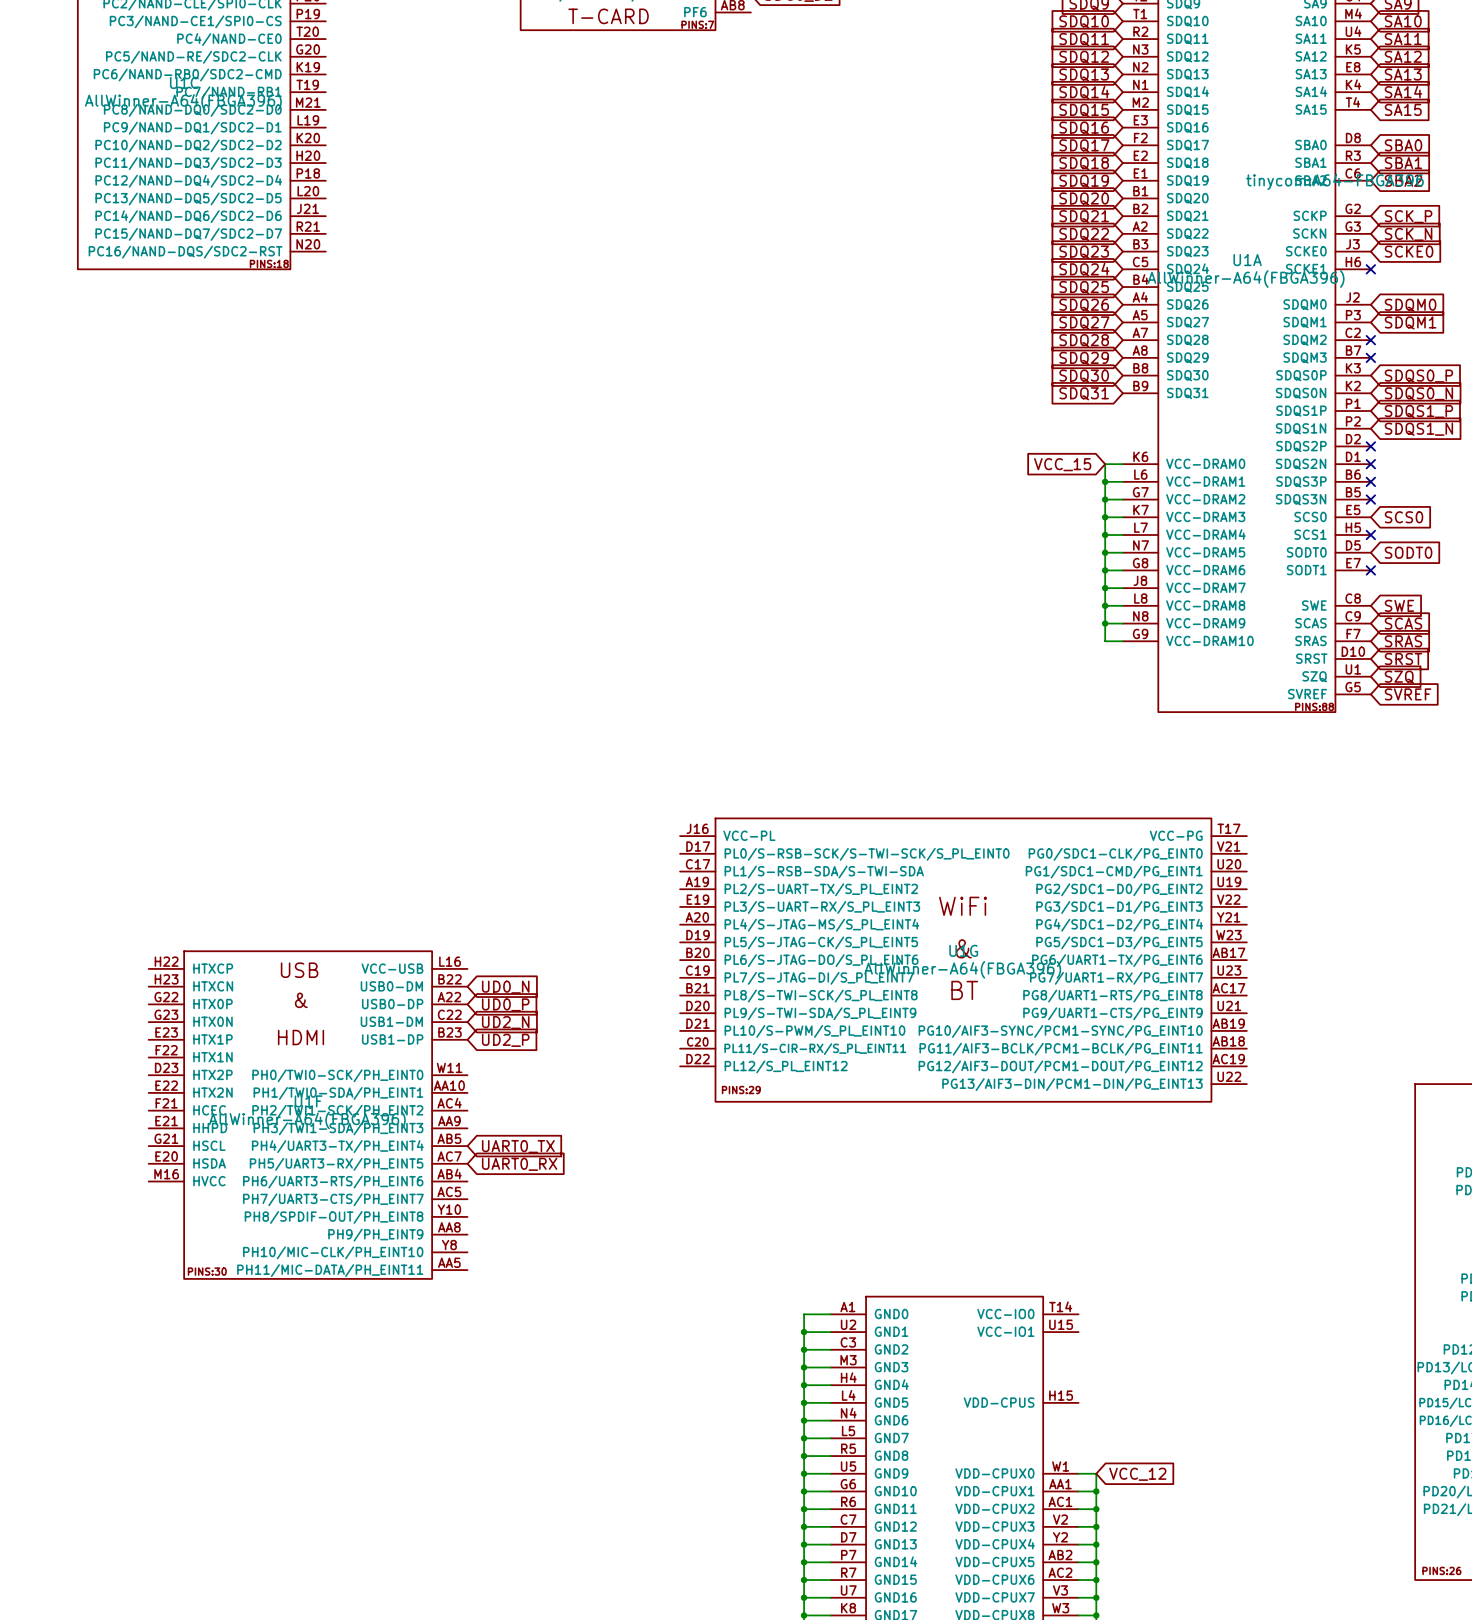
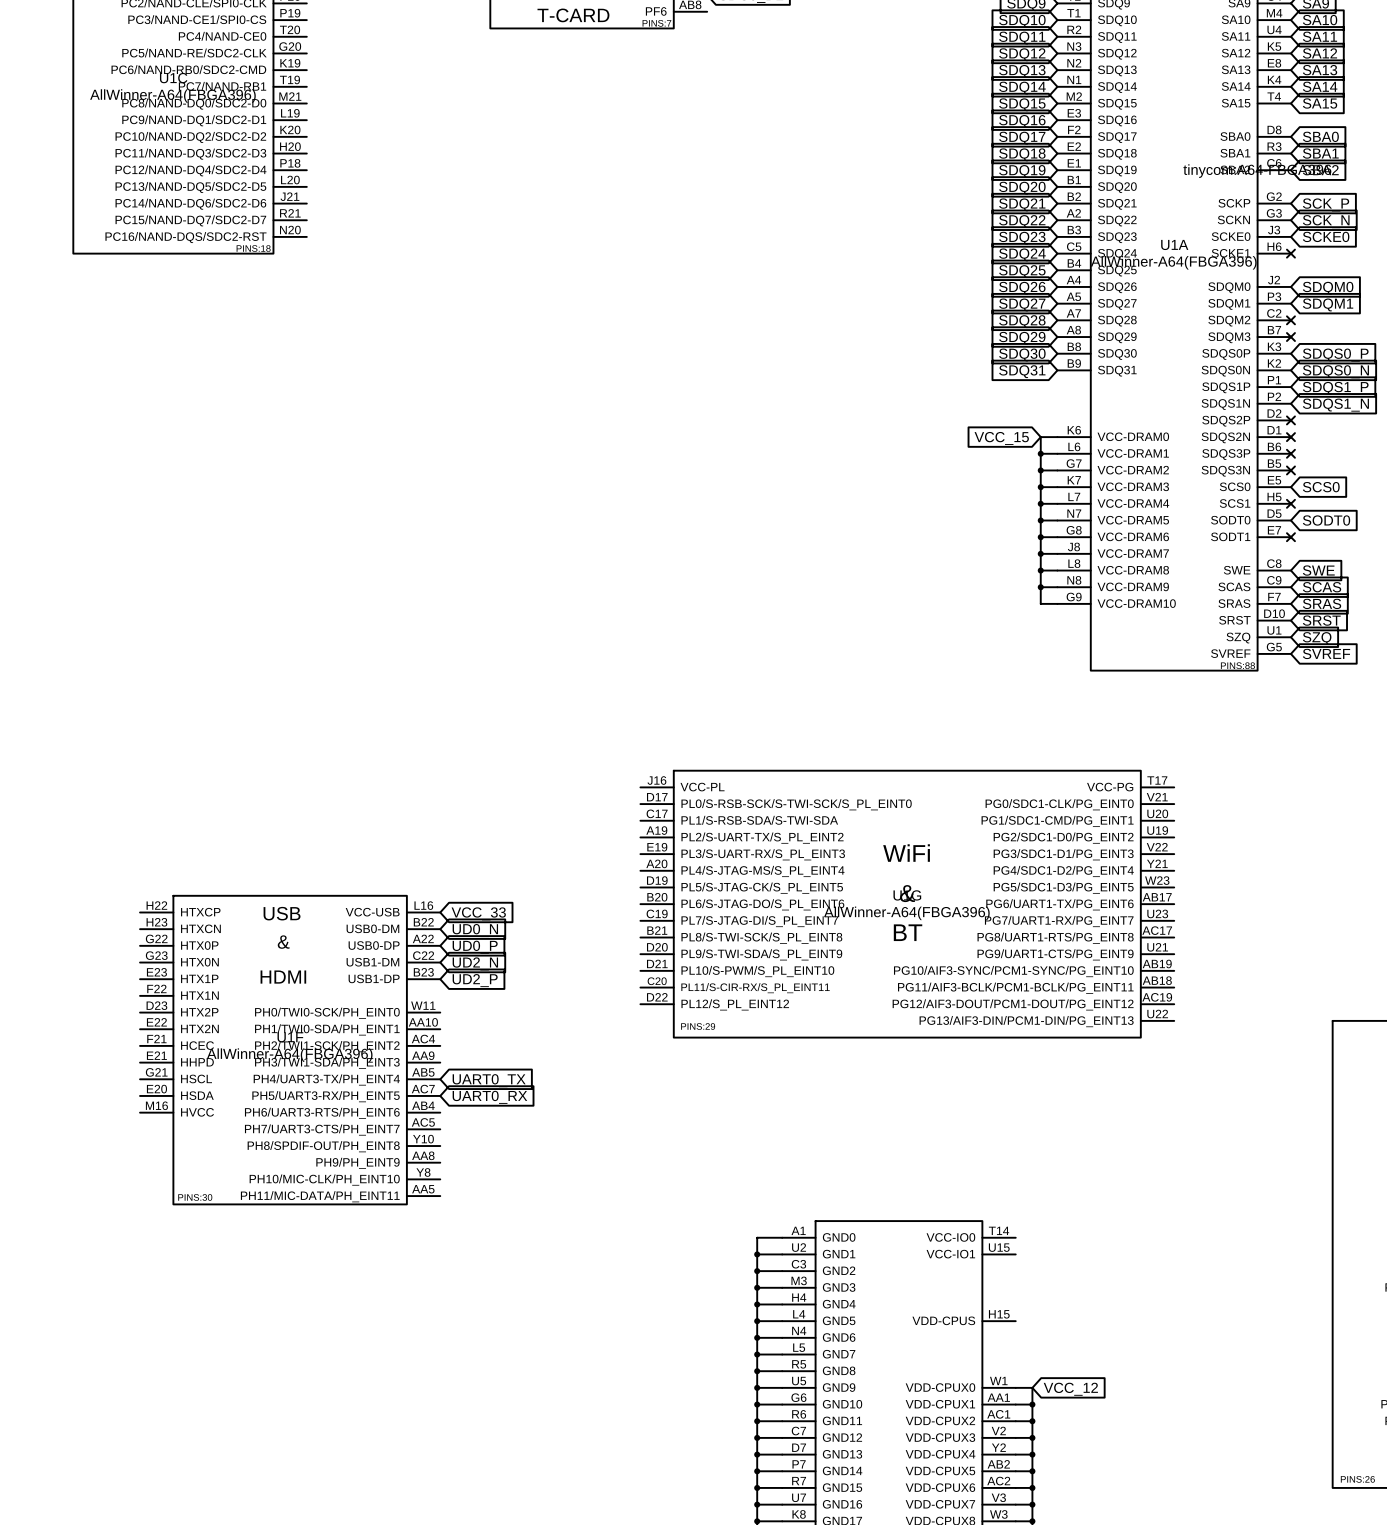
global label: none -> VCC_33 (478, 913)

